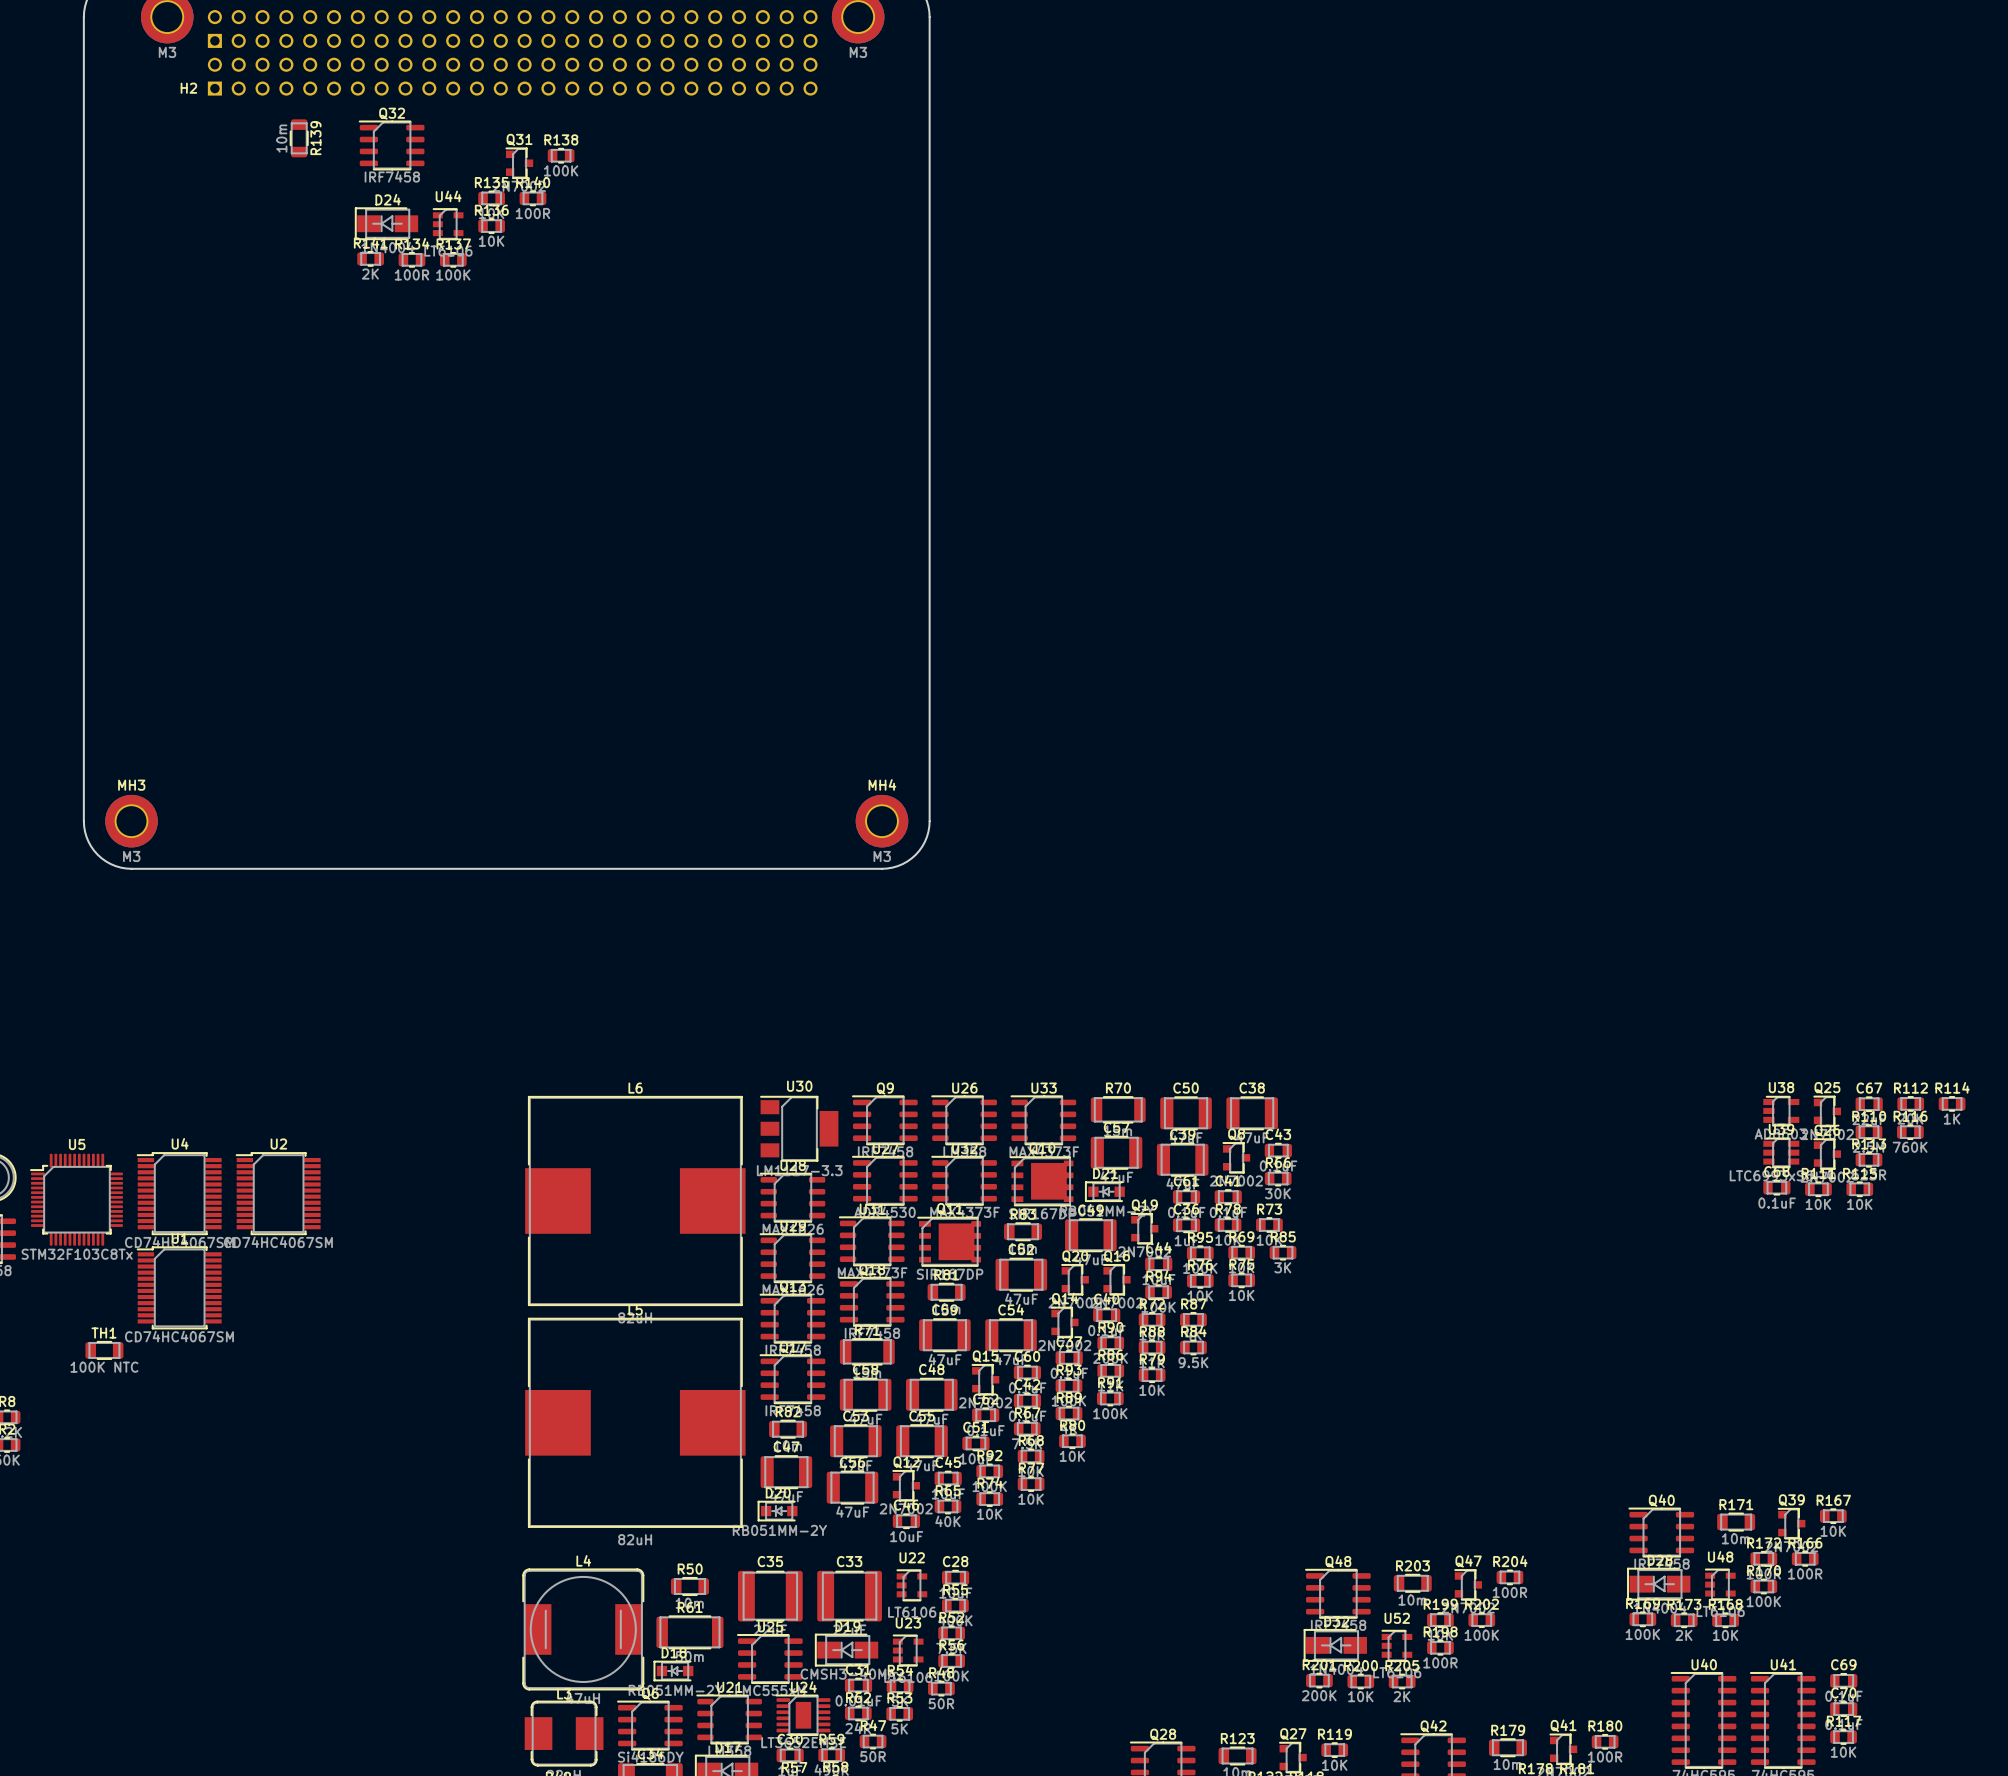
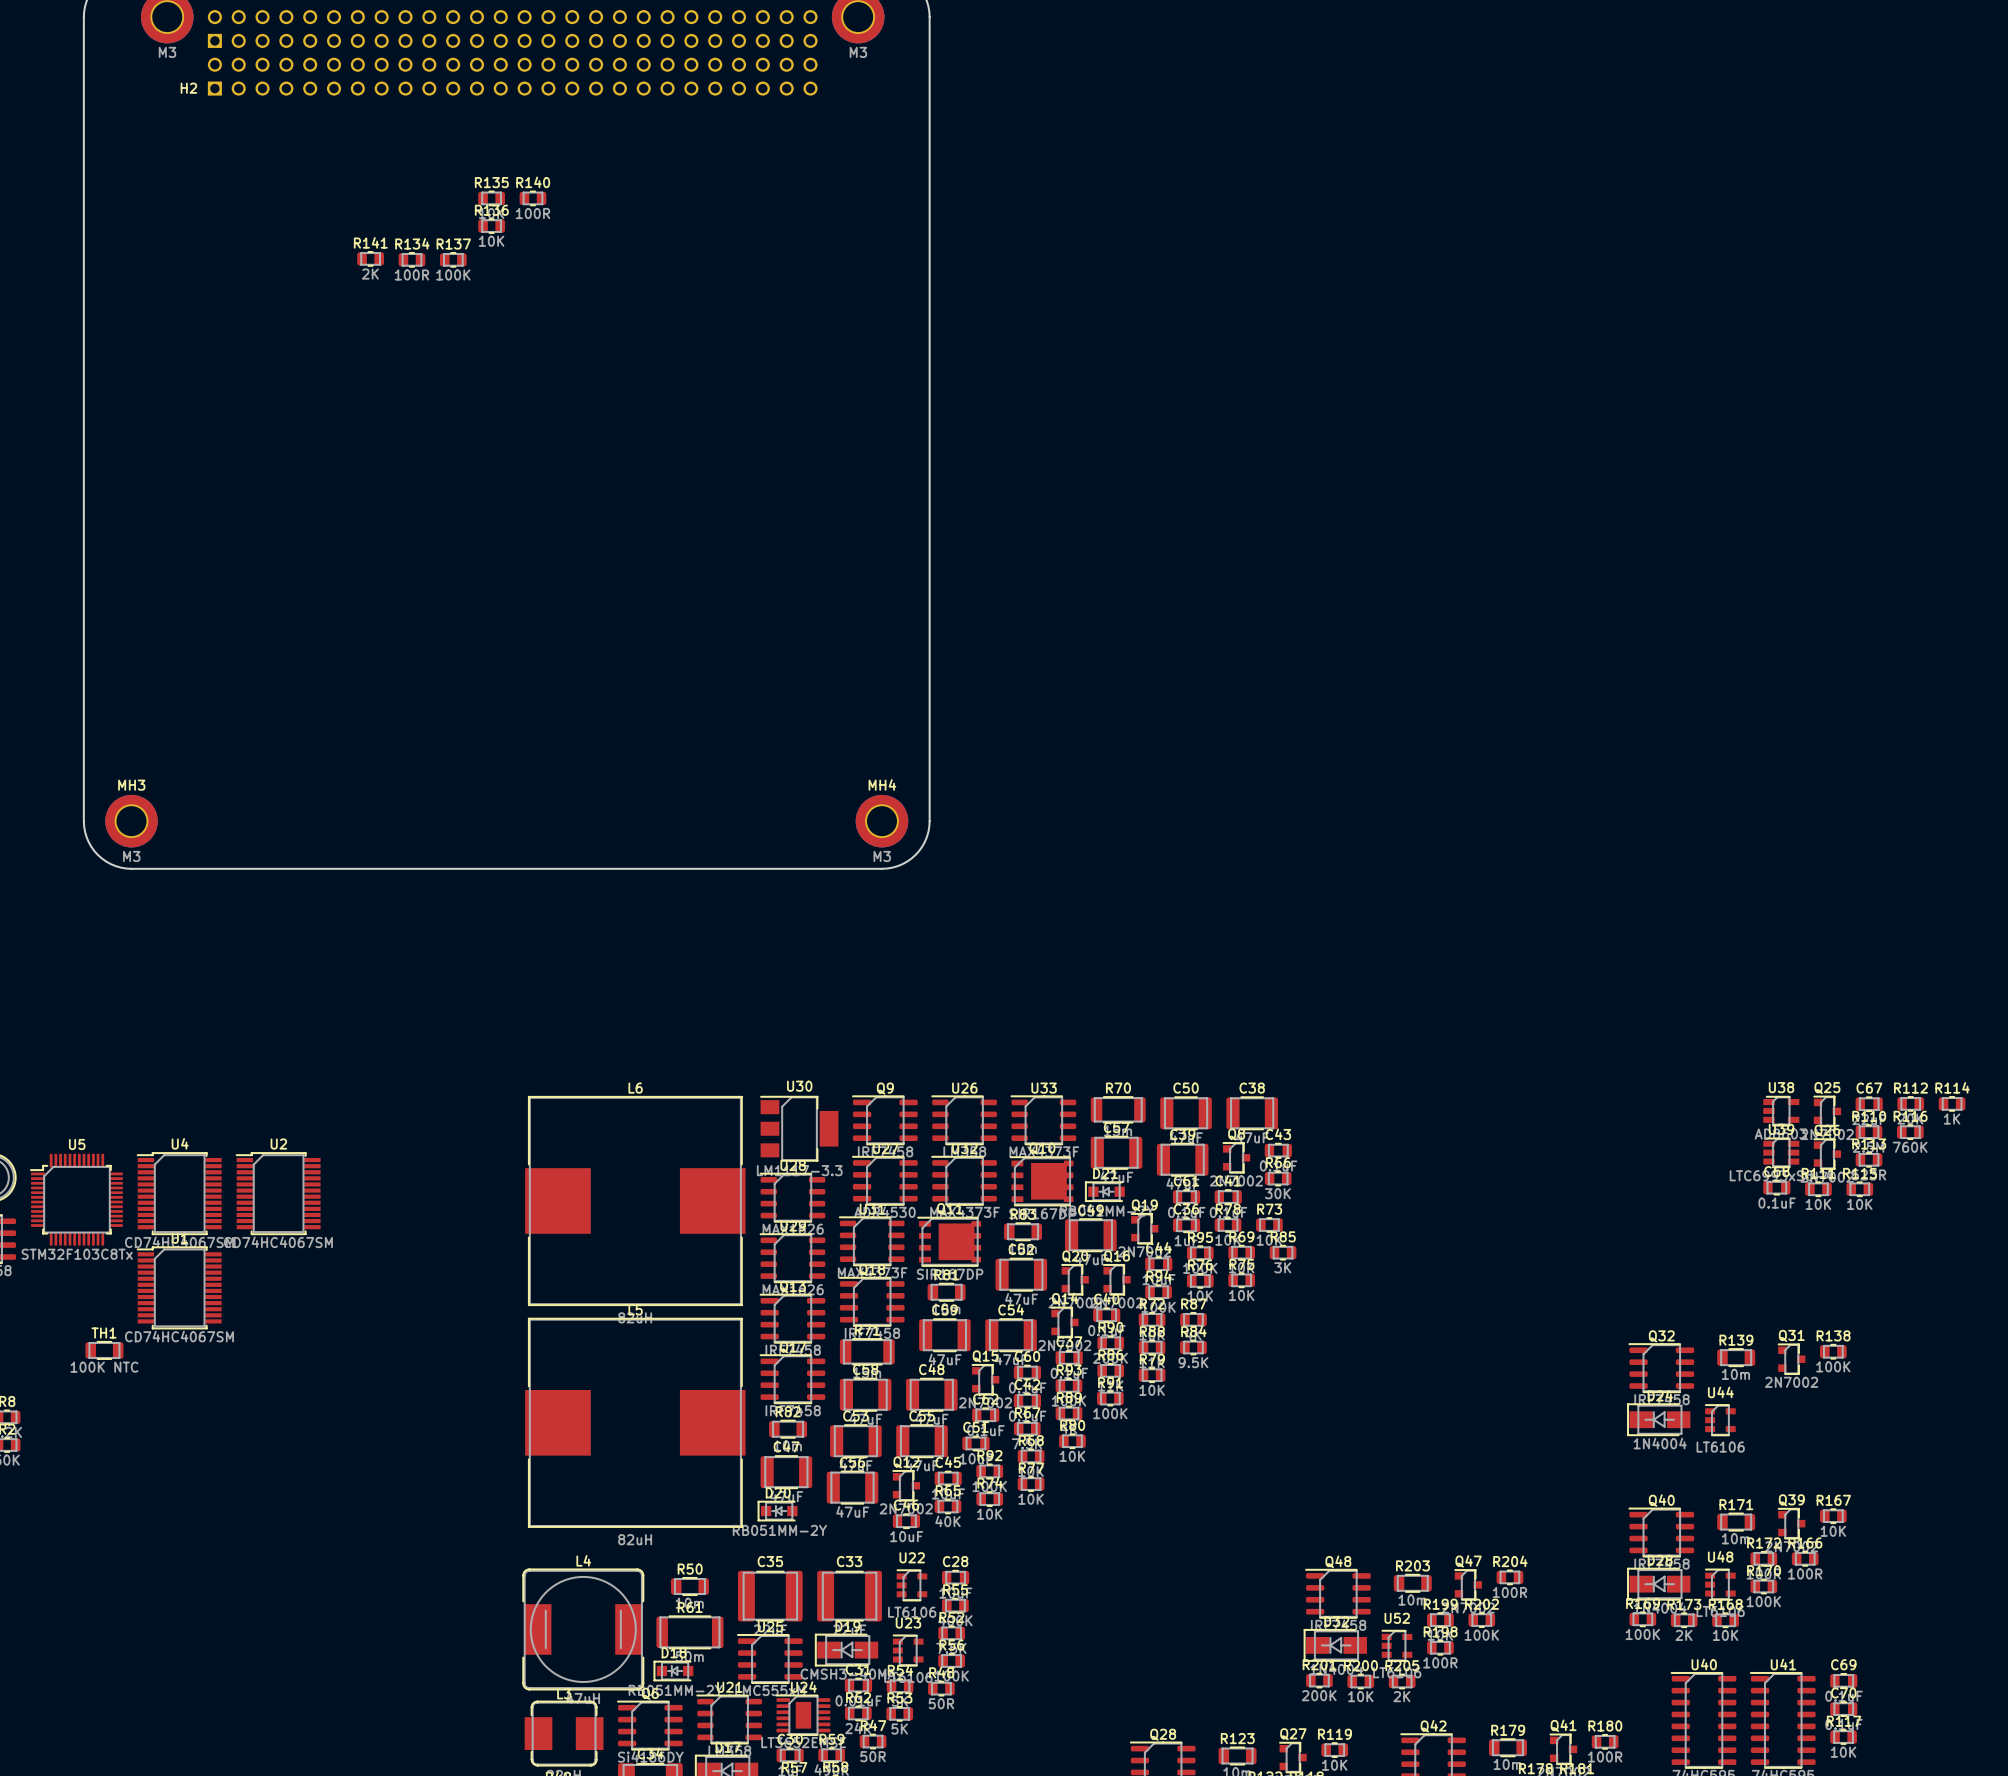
R139 value position: 10m (281, 138) -> 10m (1735, 1374)
R139 rotation: 0° (299, 138) -> 90° clockwise (1736, 1357)
R139 position: (299, 138) -> (1736, 1357)
R139 name position: R139 (315, 138) -> R139 (1736, 1340)
Q32 position: (391, 145) -> (1661, 1368)
R138 position: (561, 155) -> (1833, 1351)
Q31 position: (519, 163) -> (1791, 1359)
D24 position: (386, 223) -> (1658, 1419)
U44 position: (448, 224) -> (1720, 1420)

